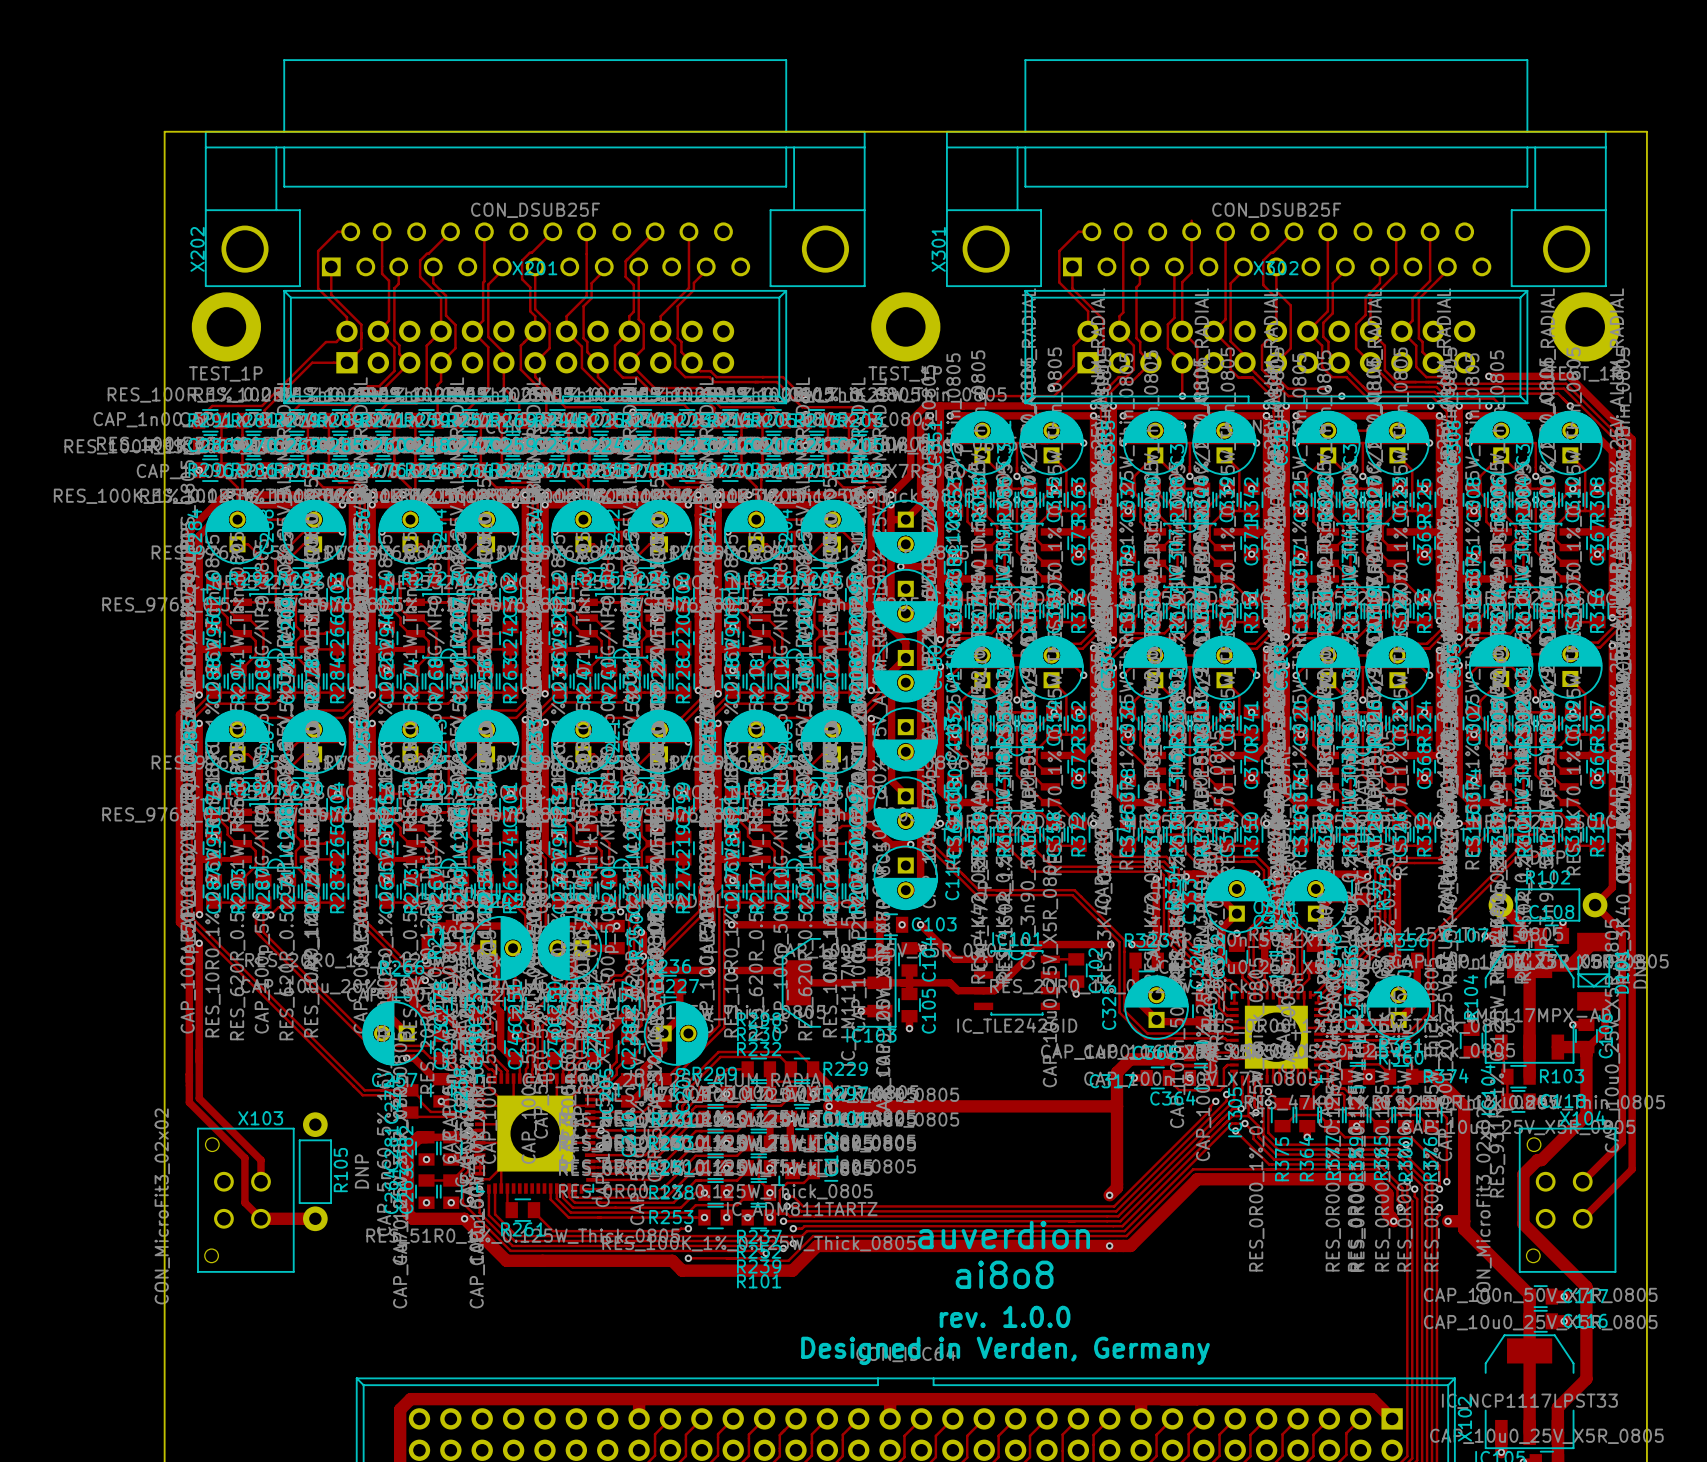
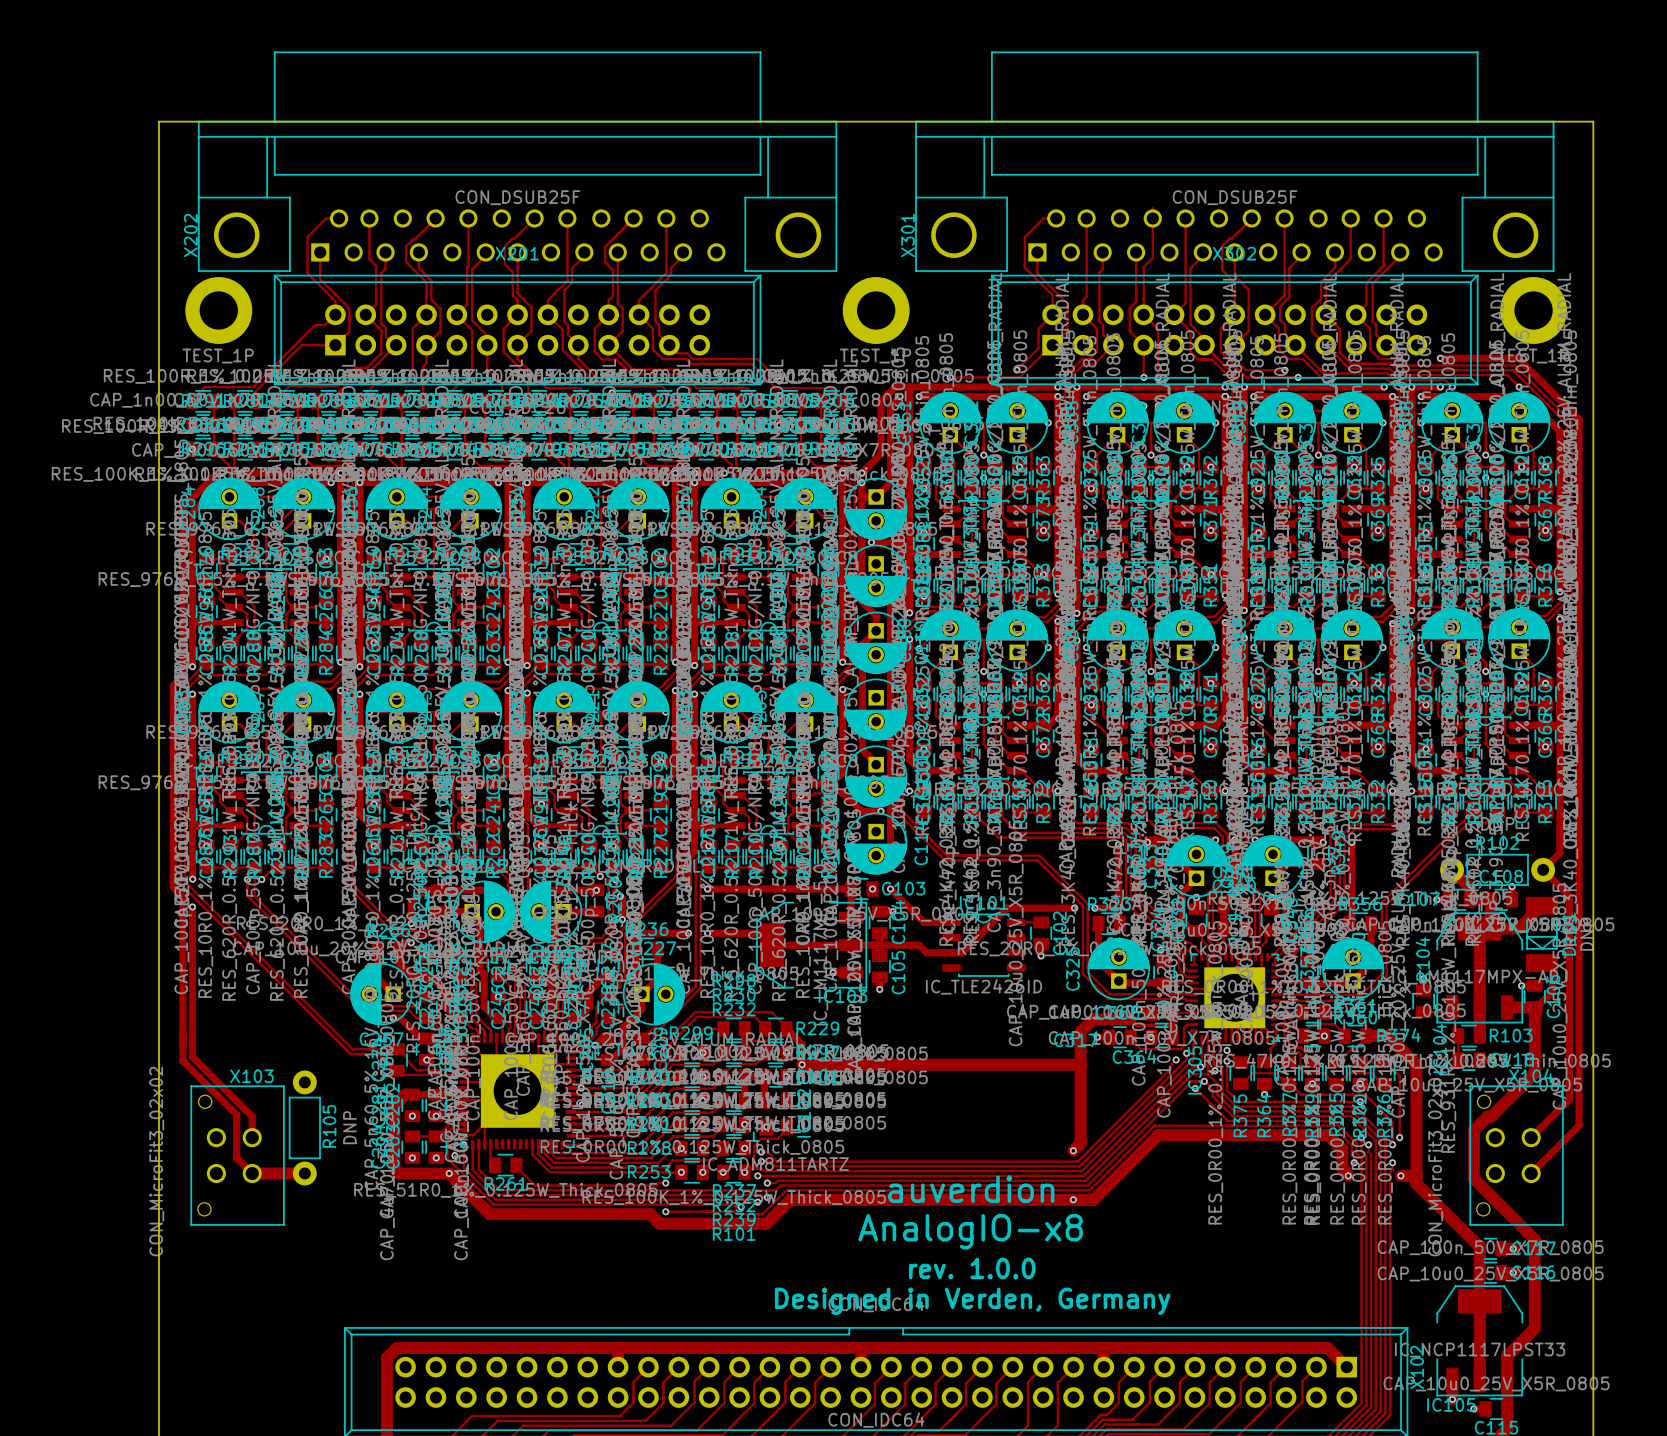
text: ai8o8 (1004, 1274) -> AnalogIO-x8 (970, 1231)

